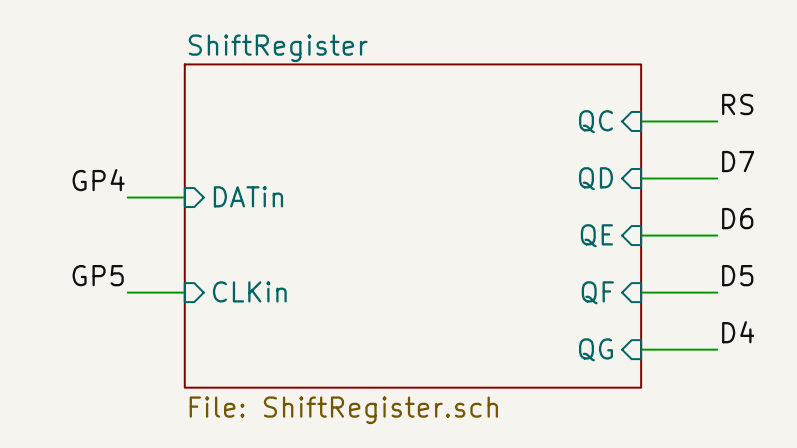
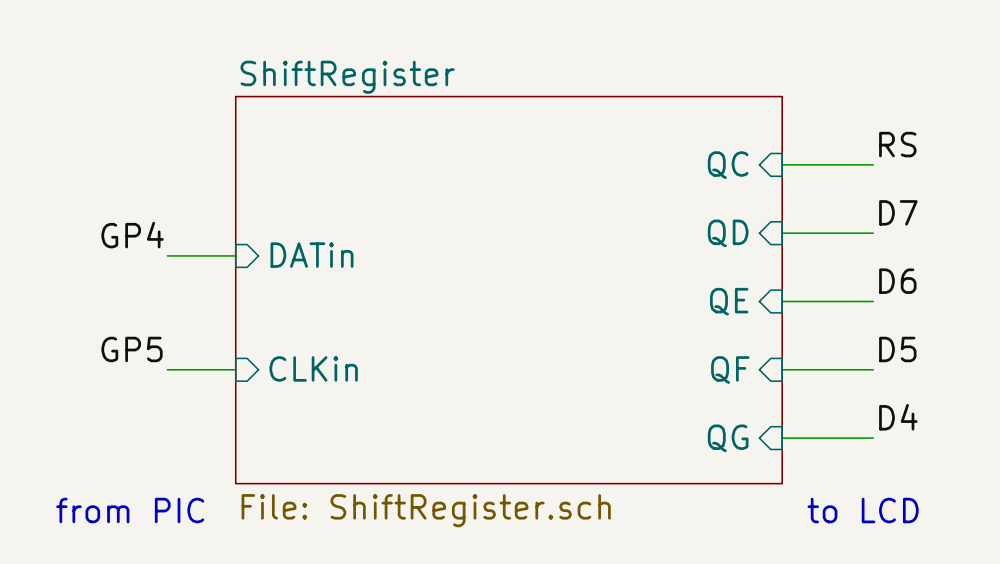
text: none -> from PIC (130, 510)
text: none -> to LCD (863, 510)

